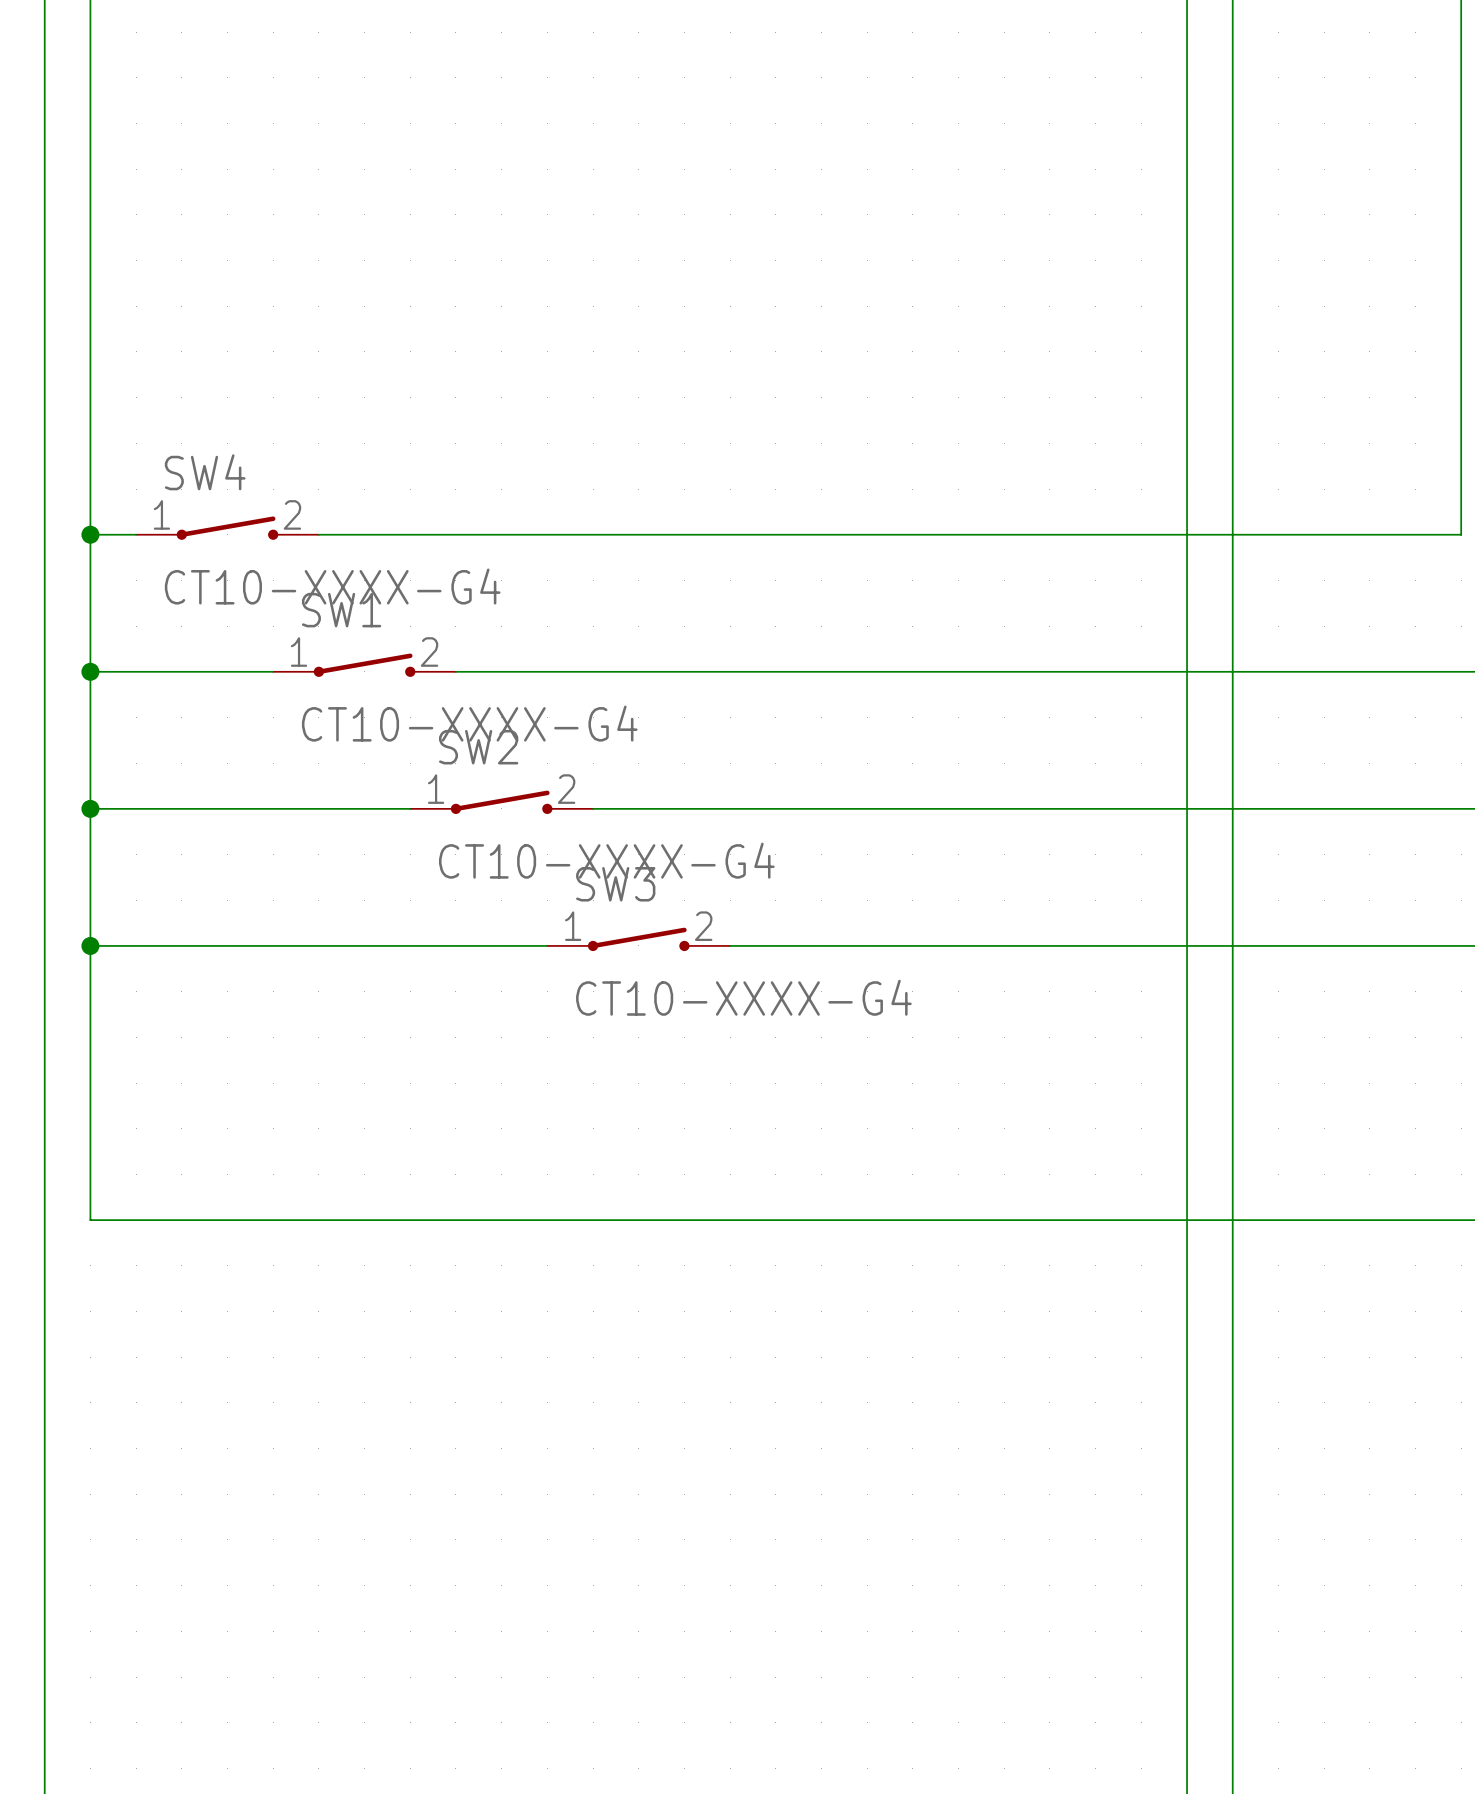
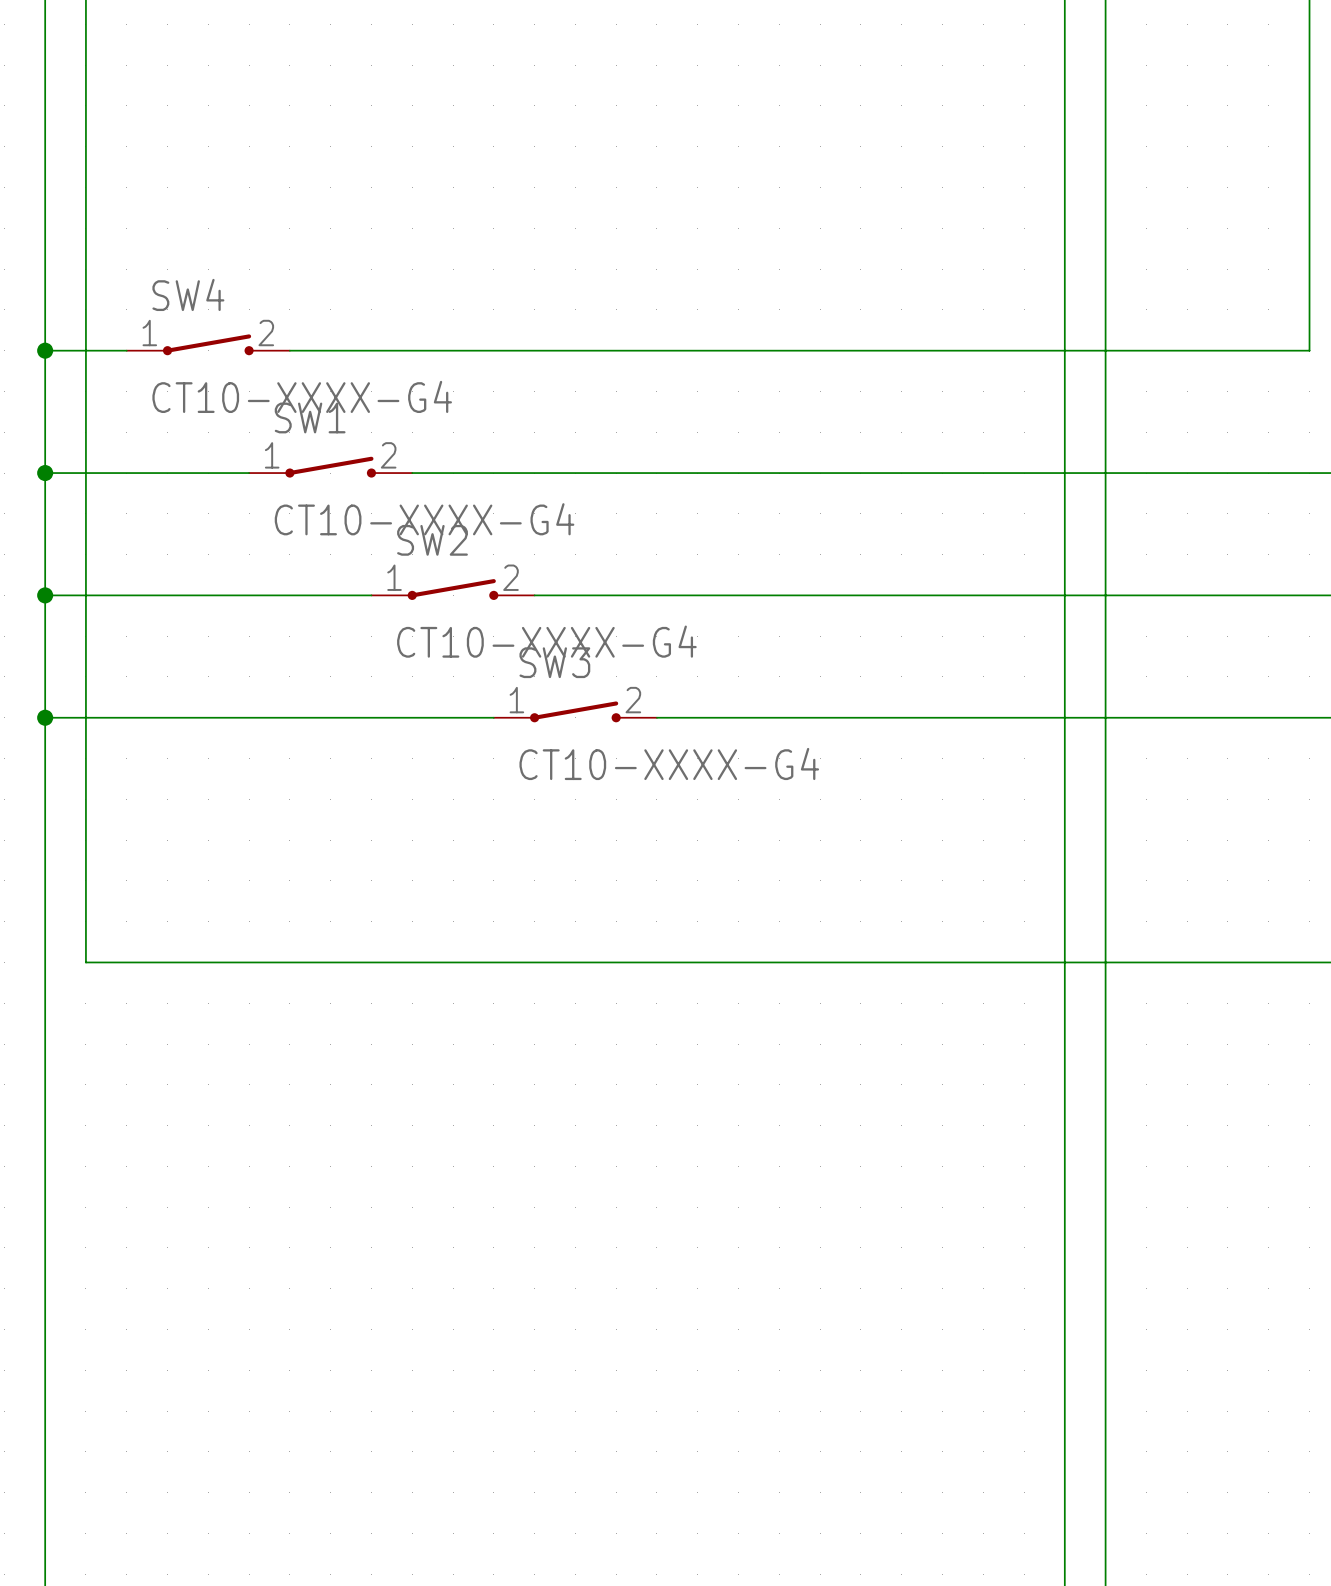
wire: none -> (45, 350) (85, 350)
junction position: (90, 534) -> (45, 350)
wire: none -> (45, 473) (85, 473)
junction position: (90, 671) -> (45, 473)
wire: none -> (45, 595) (85, 595)
junction position: (90, 808) -> (45, 595)
wire: none -> (45, 717) (85, 717)
junction position: (90, 945) -> (45, 717)

